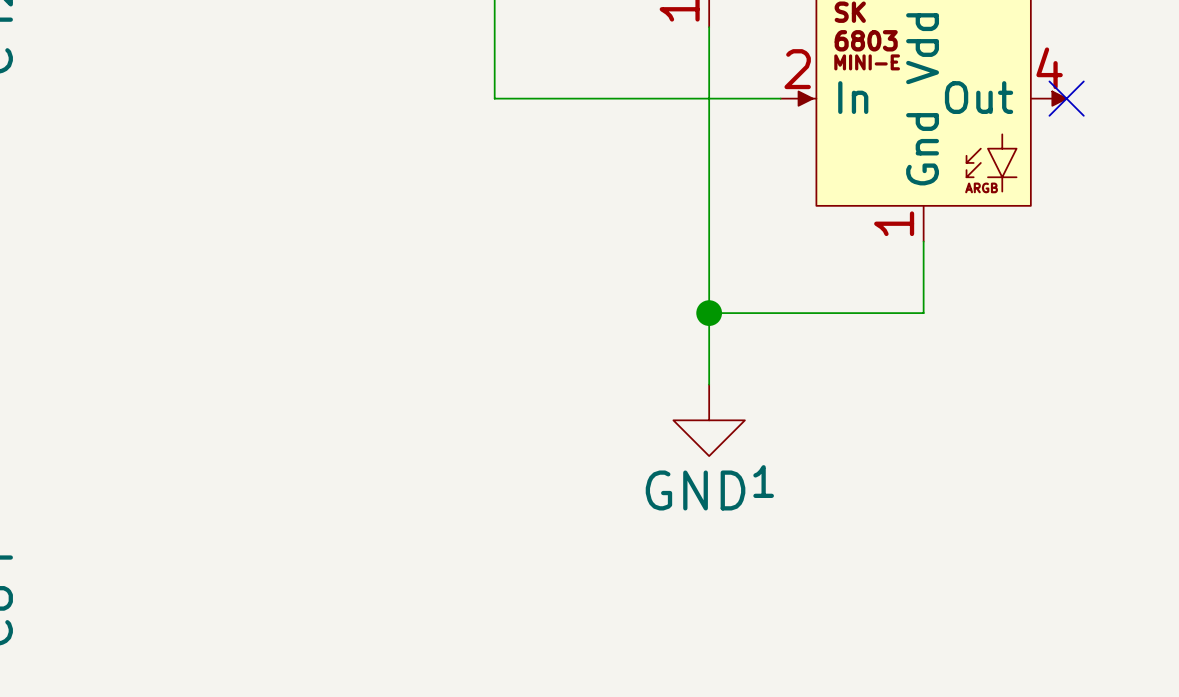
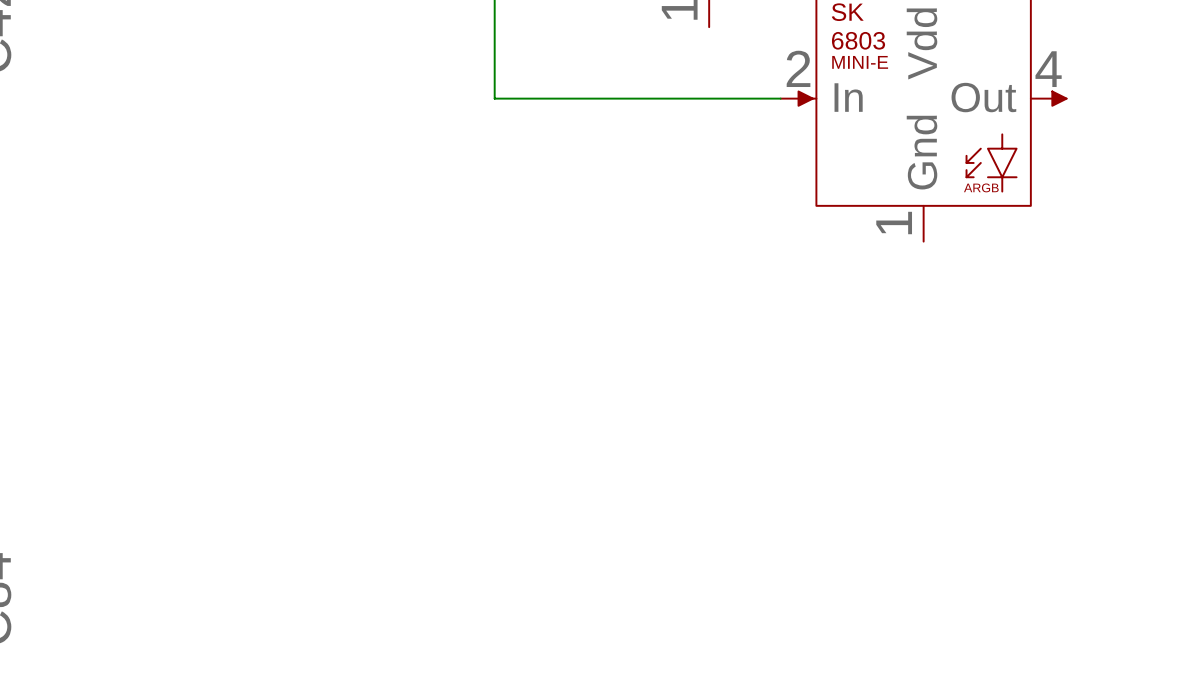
wire: (709, 27) (709, 384) -> none
no-connect mark: (1066, 98) -> none
wire: (923, 241) (923, 313) (709, 313) -> none
junction: (709, 313) -> none
power symbol: GND1 (709, 420) -> none

